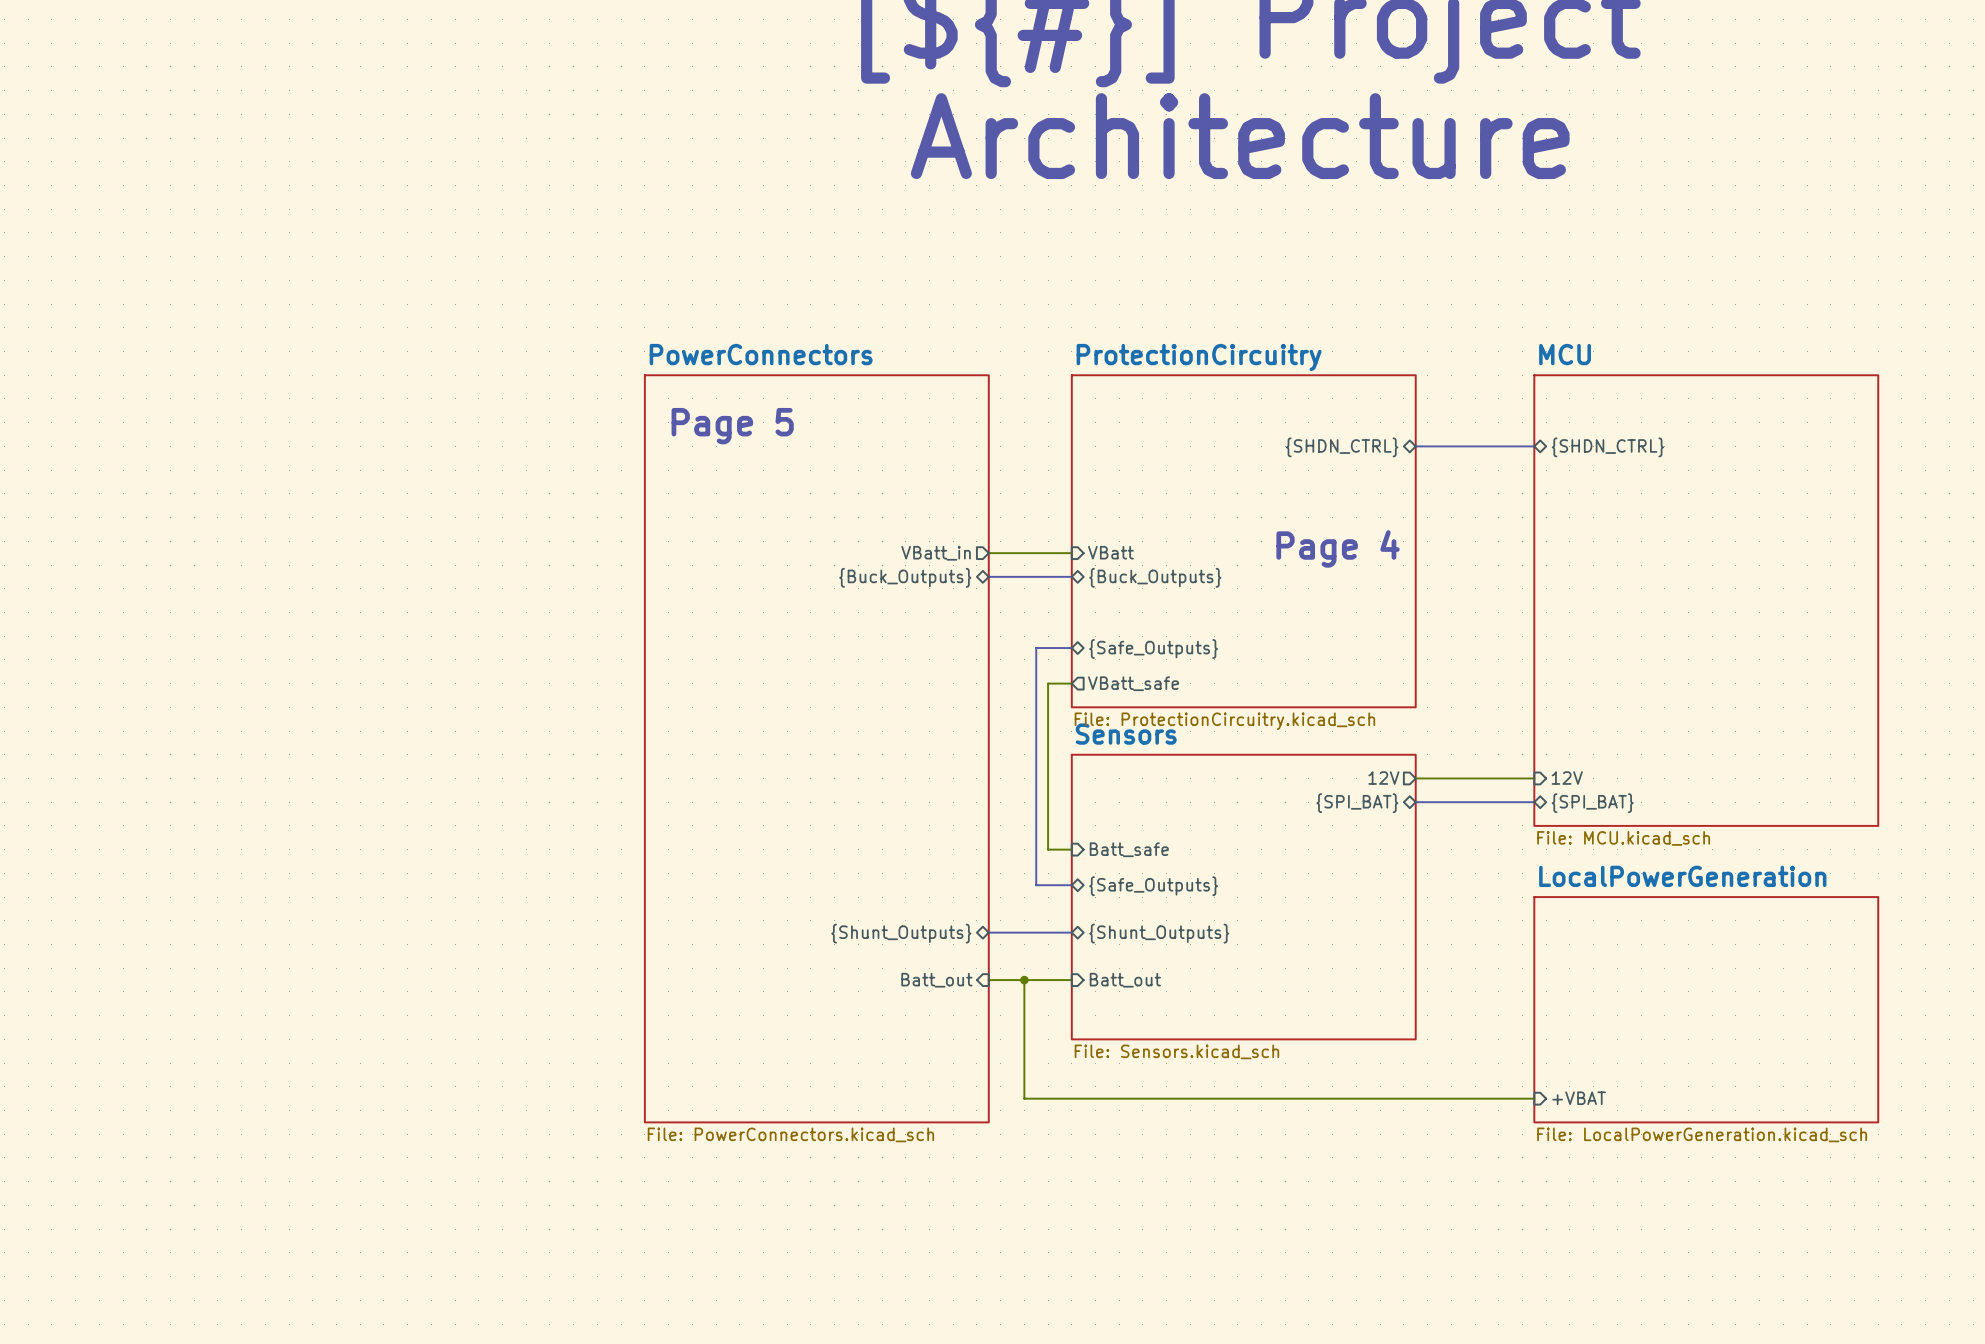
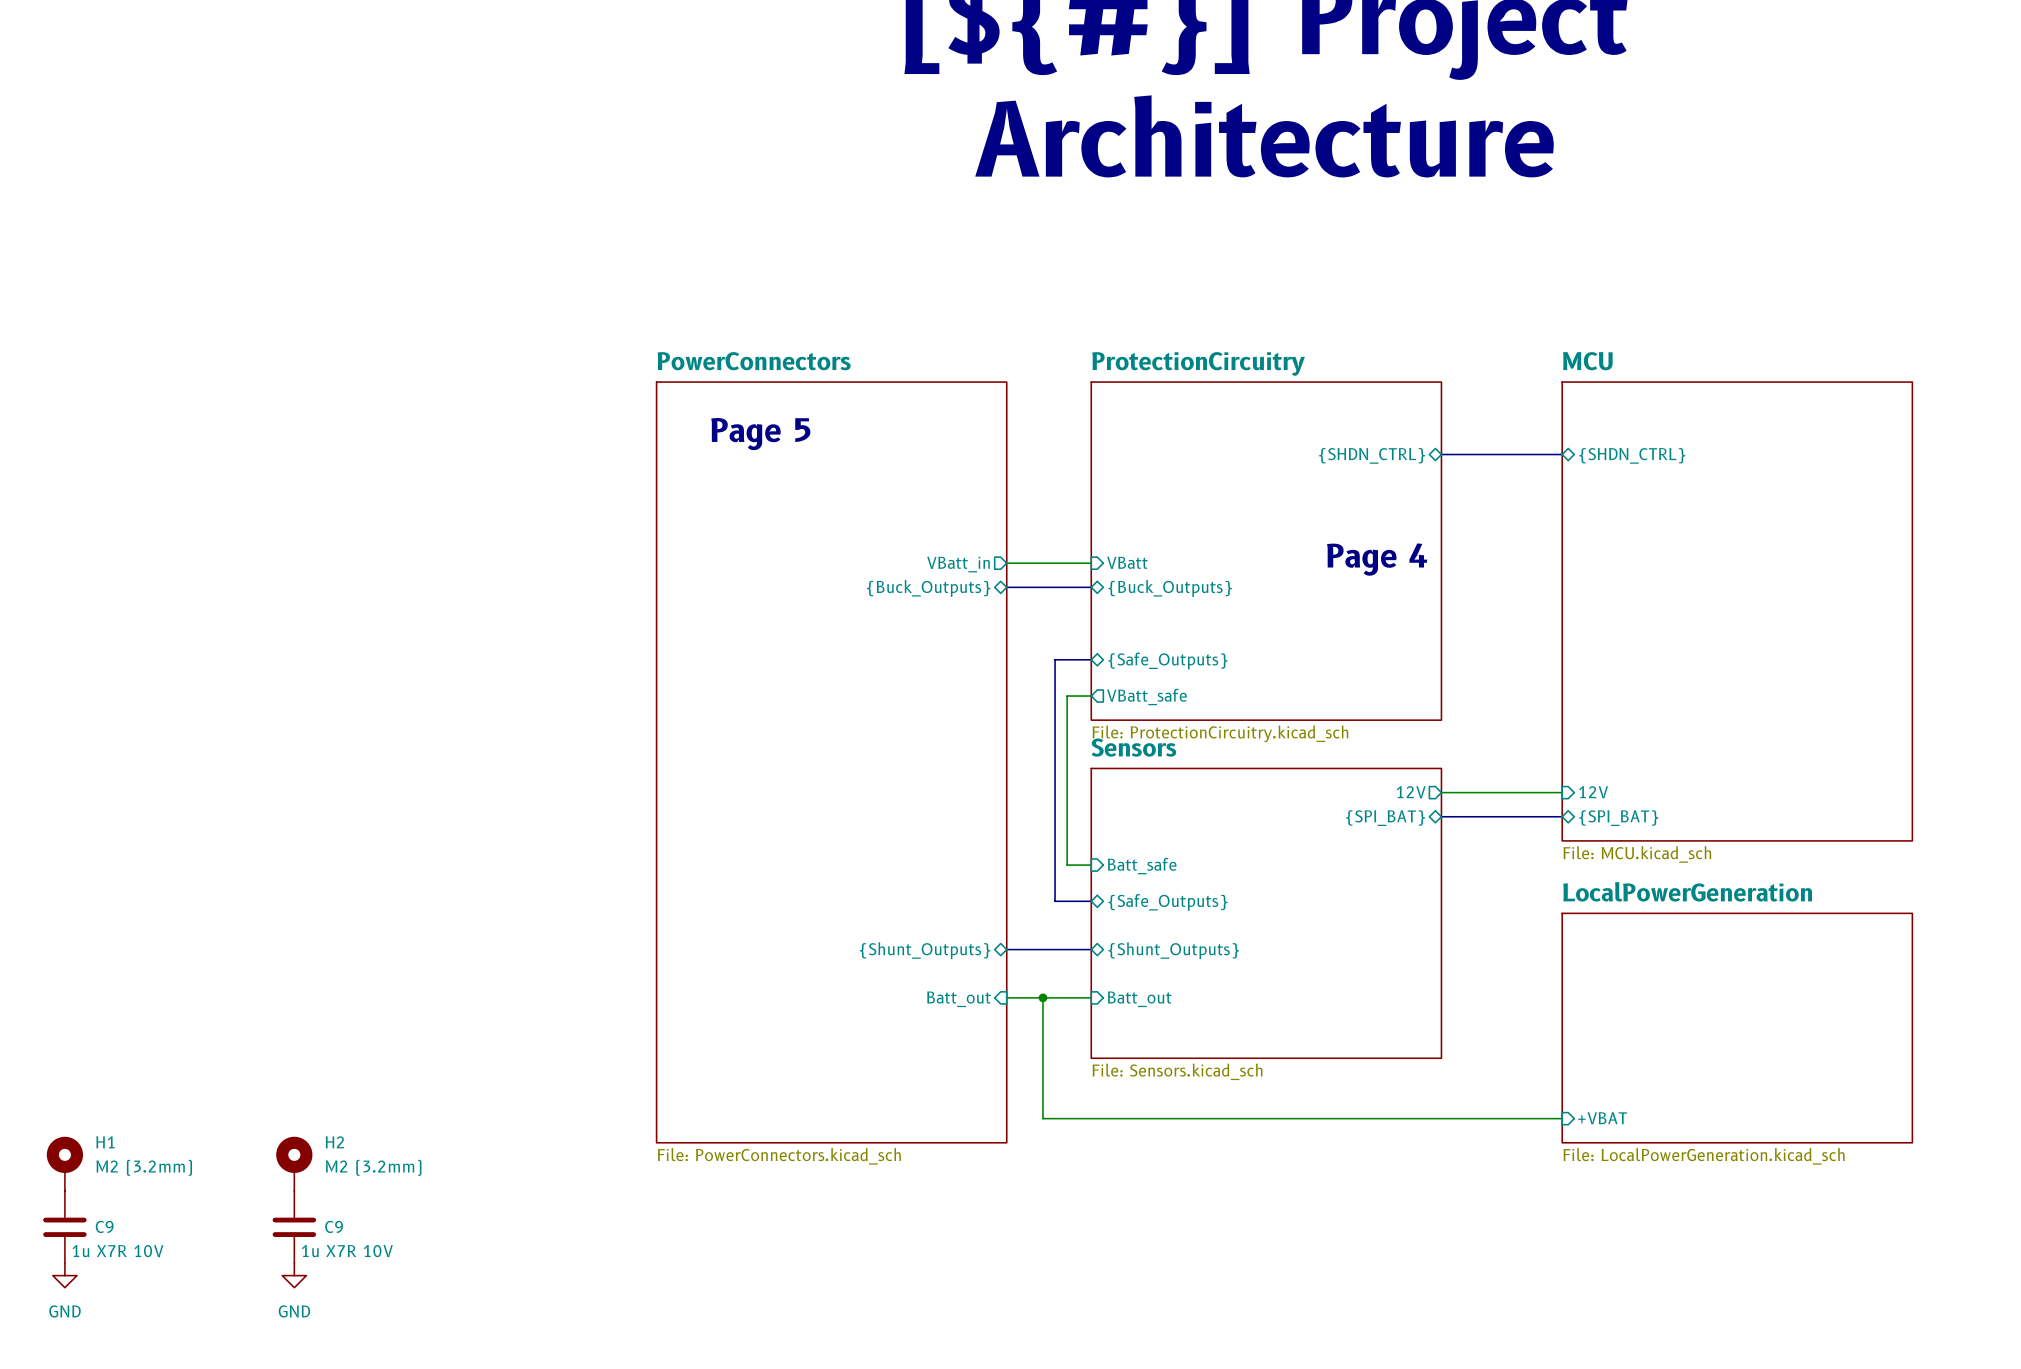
H1: none -> M2 (3.2mm) (64, 1163)
H2: none -> M2 (3.2mm) (294, 1163)
C9: none -> 1u X7R 10V (64, 1227)
C9: none -> 1u X7R 10V (294, 1227)
power symbol: none -> GND (64, 1275)
power symbol: none -> GND (294, 1275)

